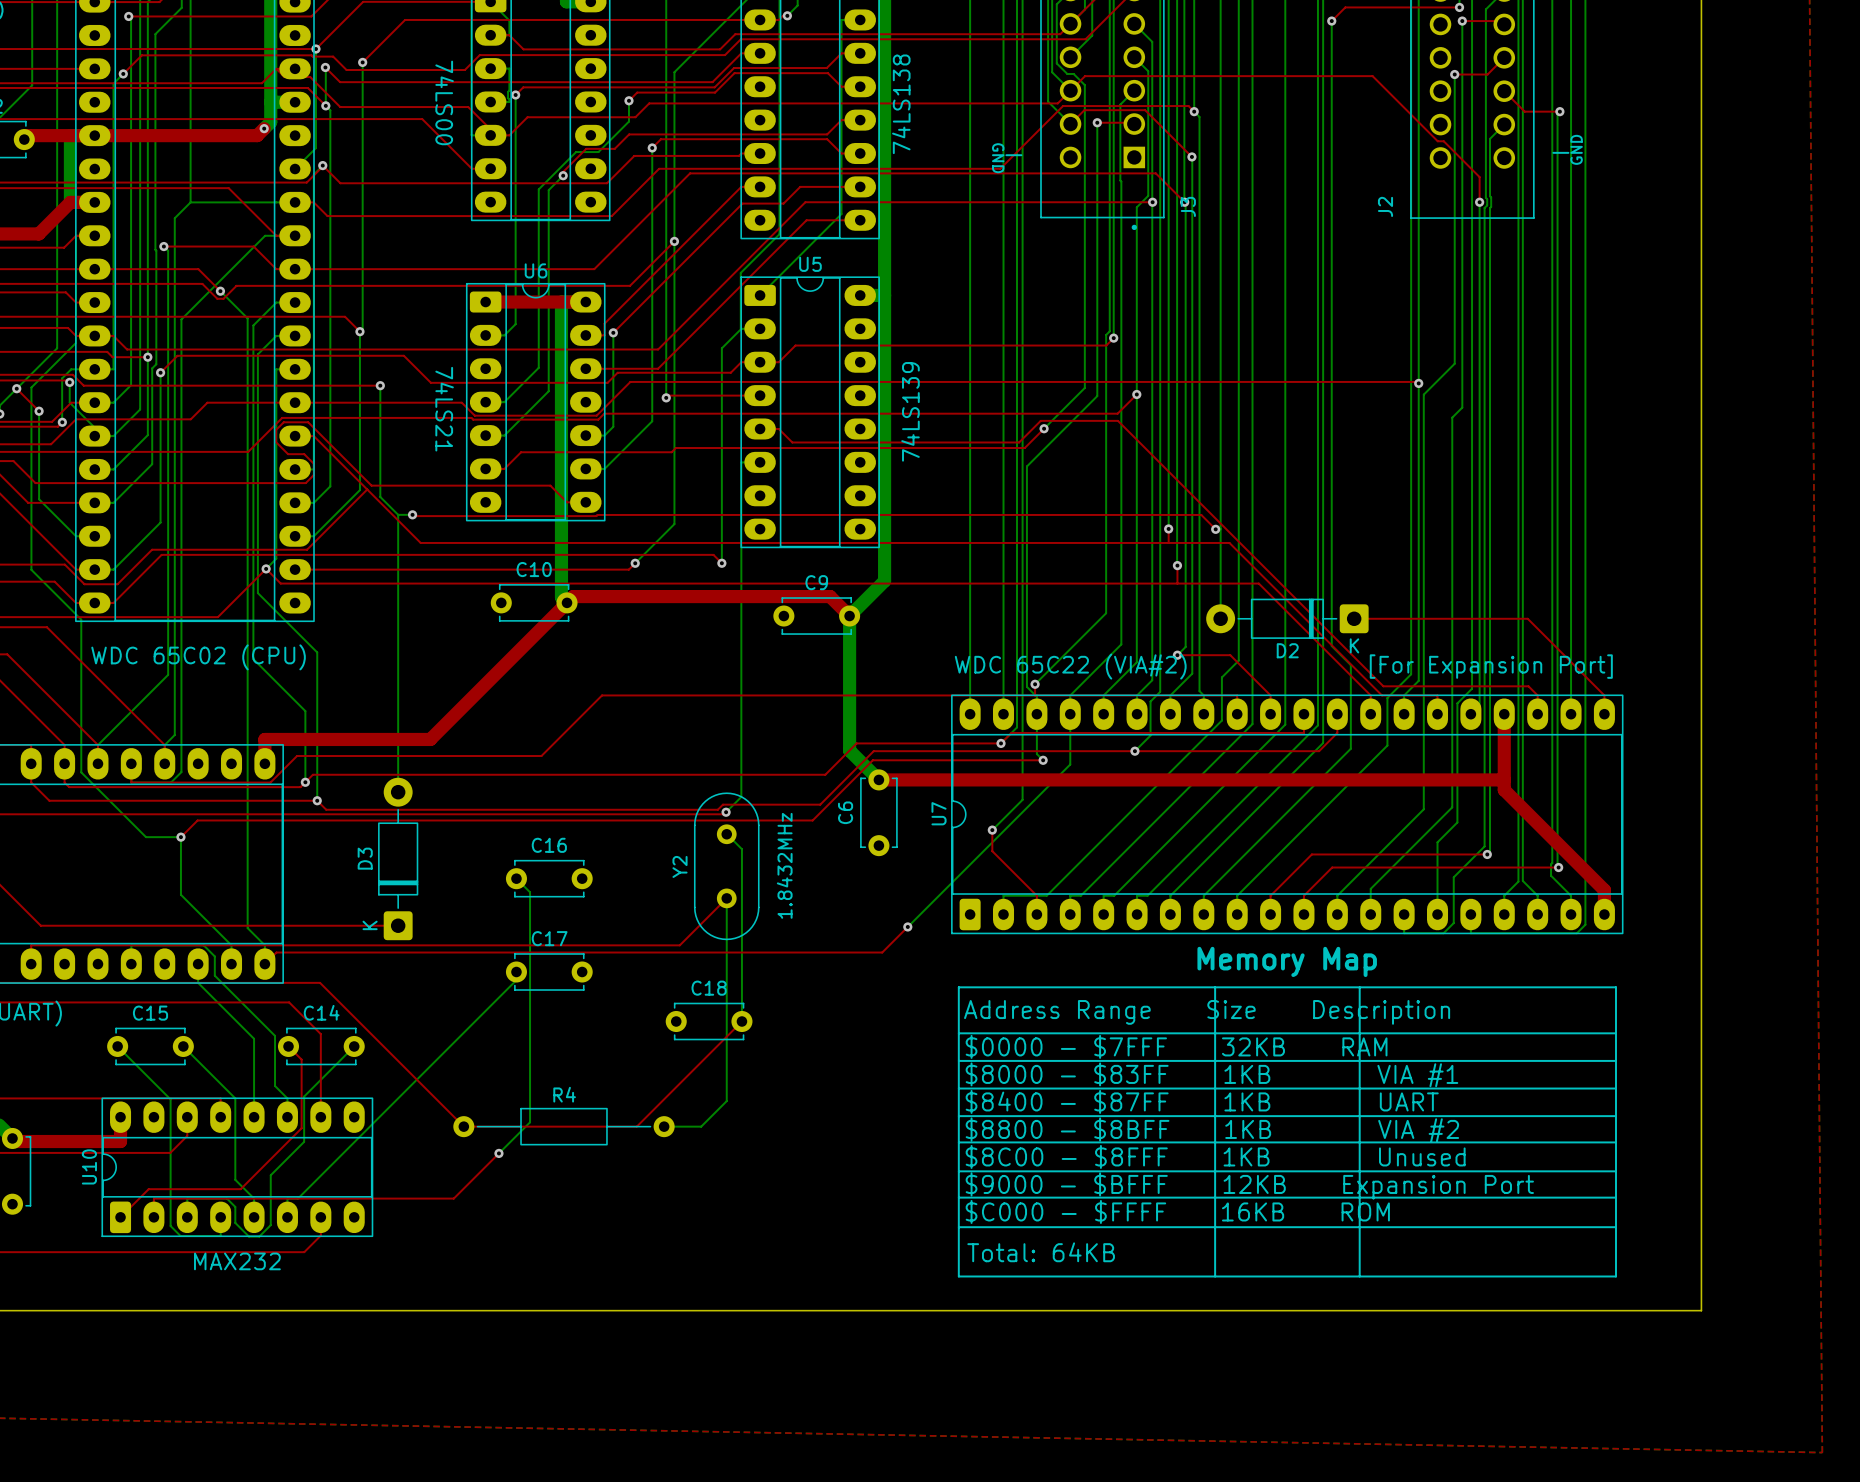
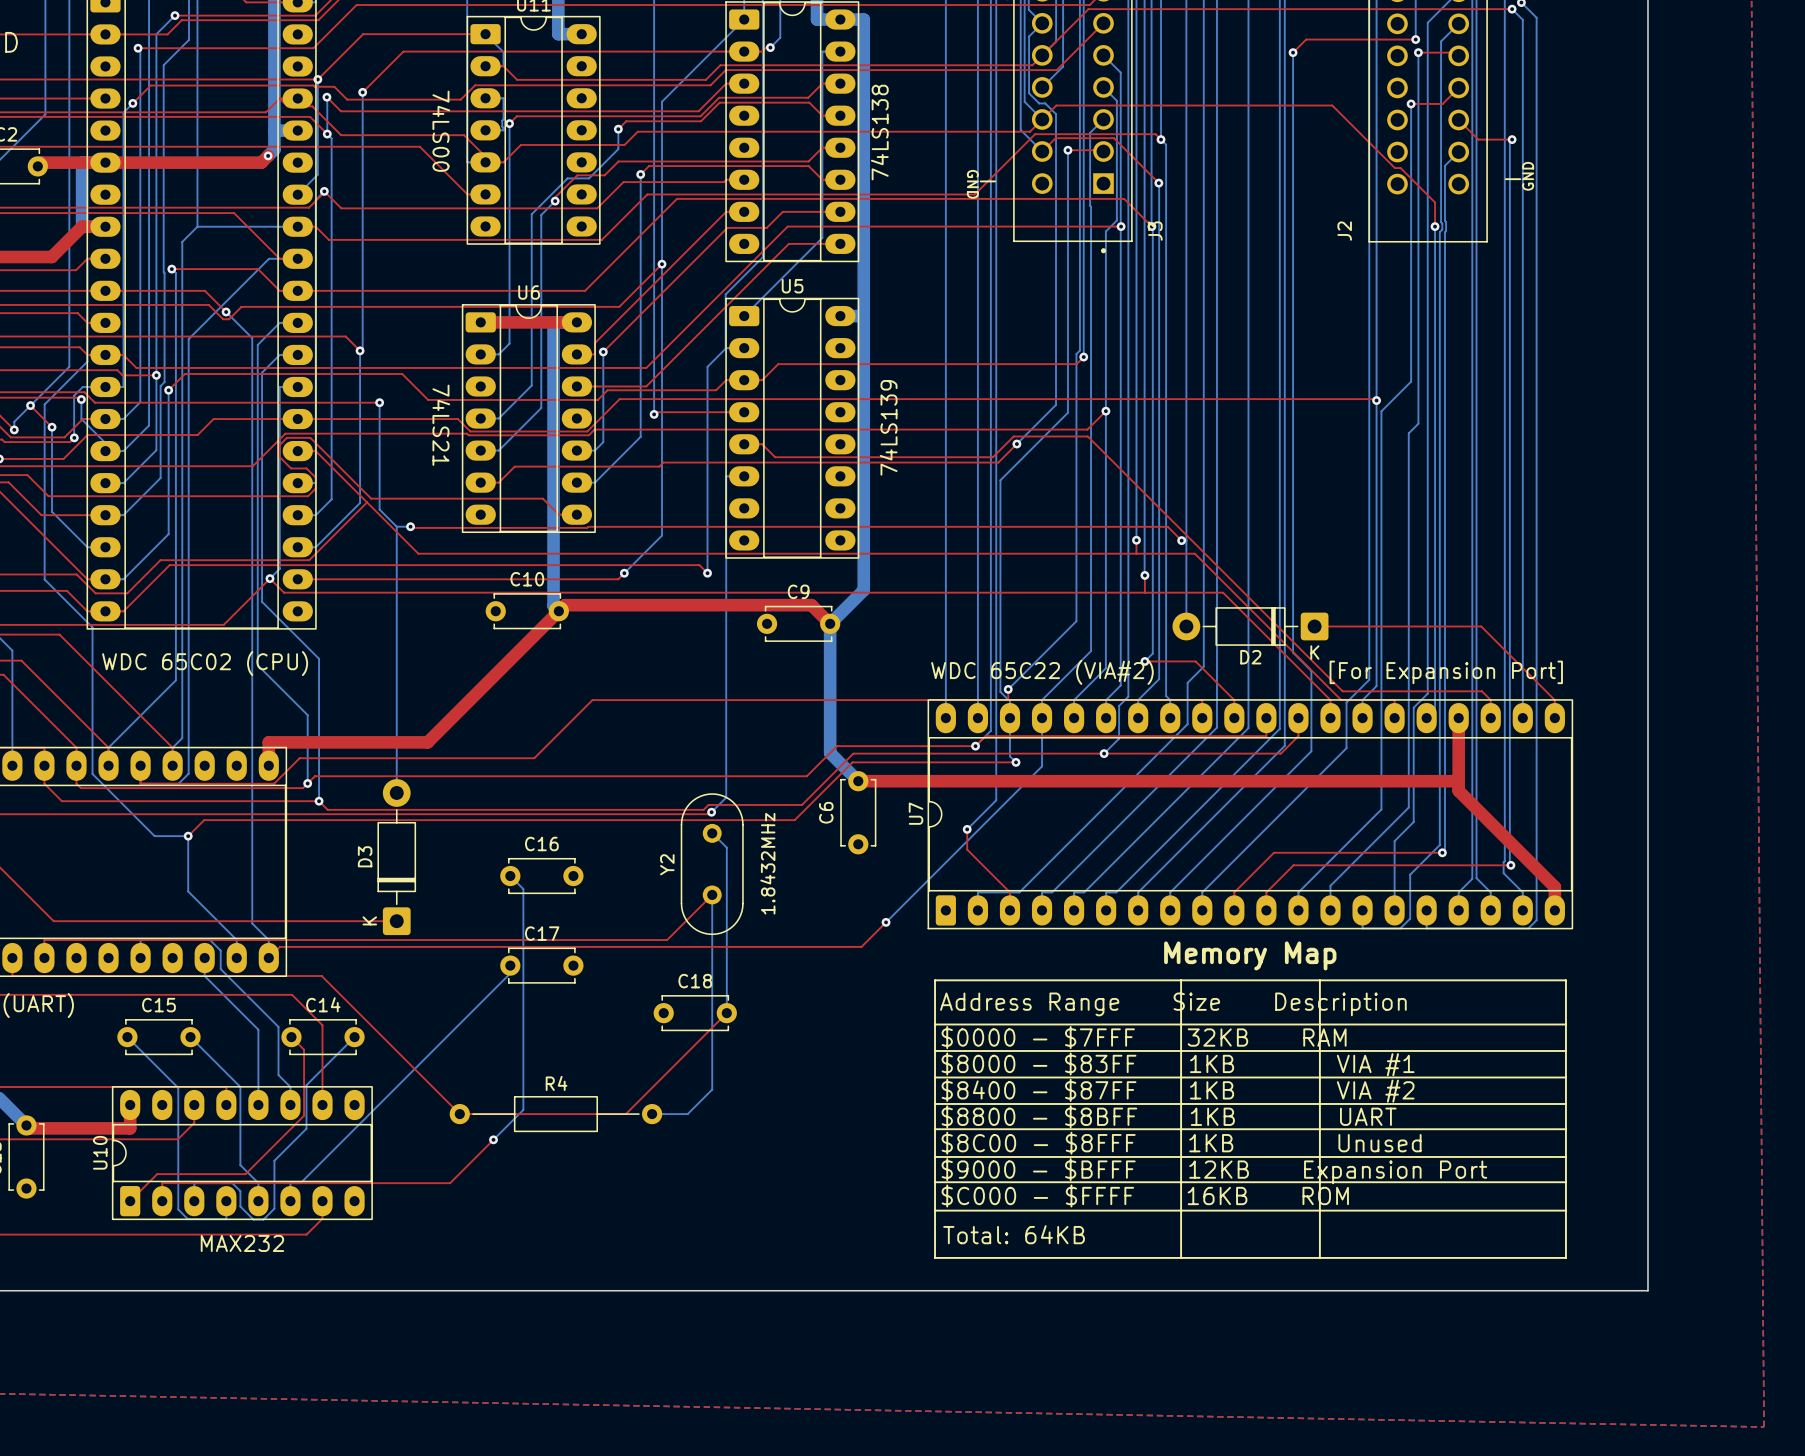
text: $8400 - $87FF 1KB UART (1202, 1101) -> $8400 - $87FF 1KB VIA #2 (1178, 1090)
text: $8800 - $8BFF 1KB VIA #2 (1212, 1129) -> $8800 - $8BFF 1KB UART (1169, 1116)

